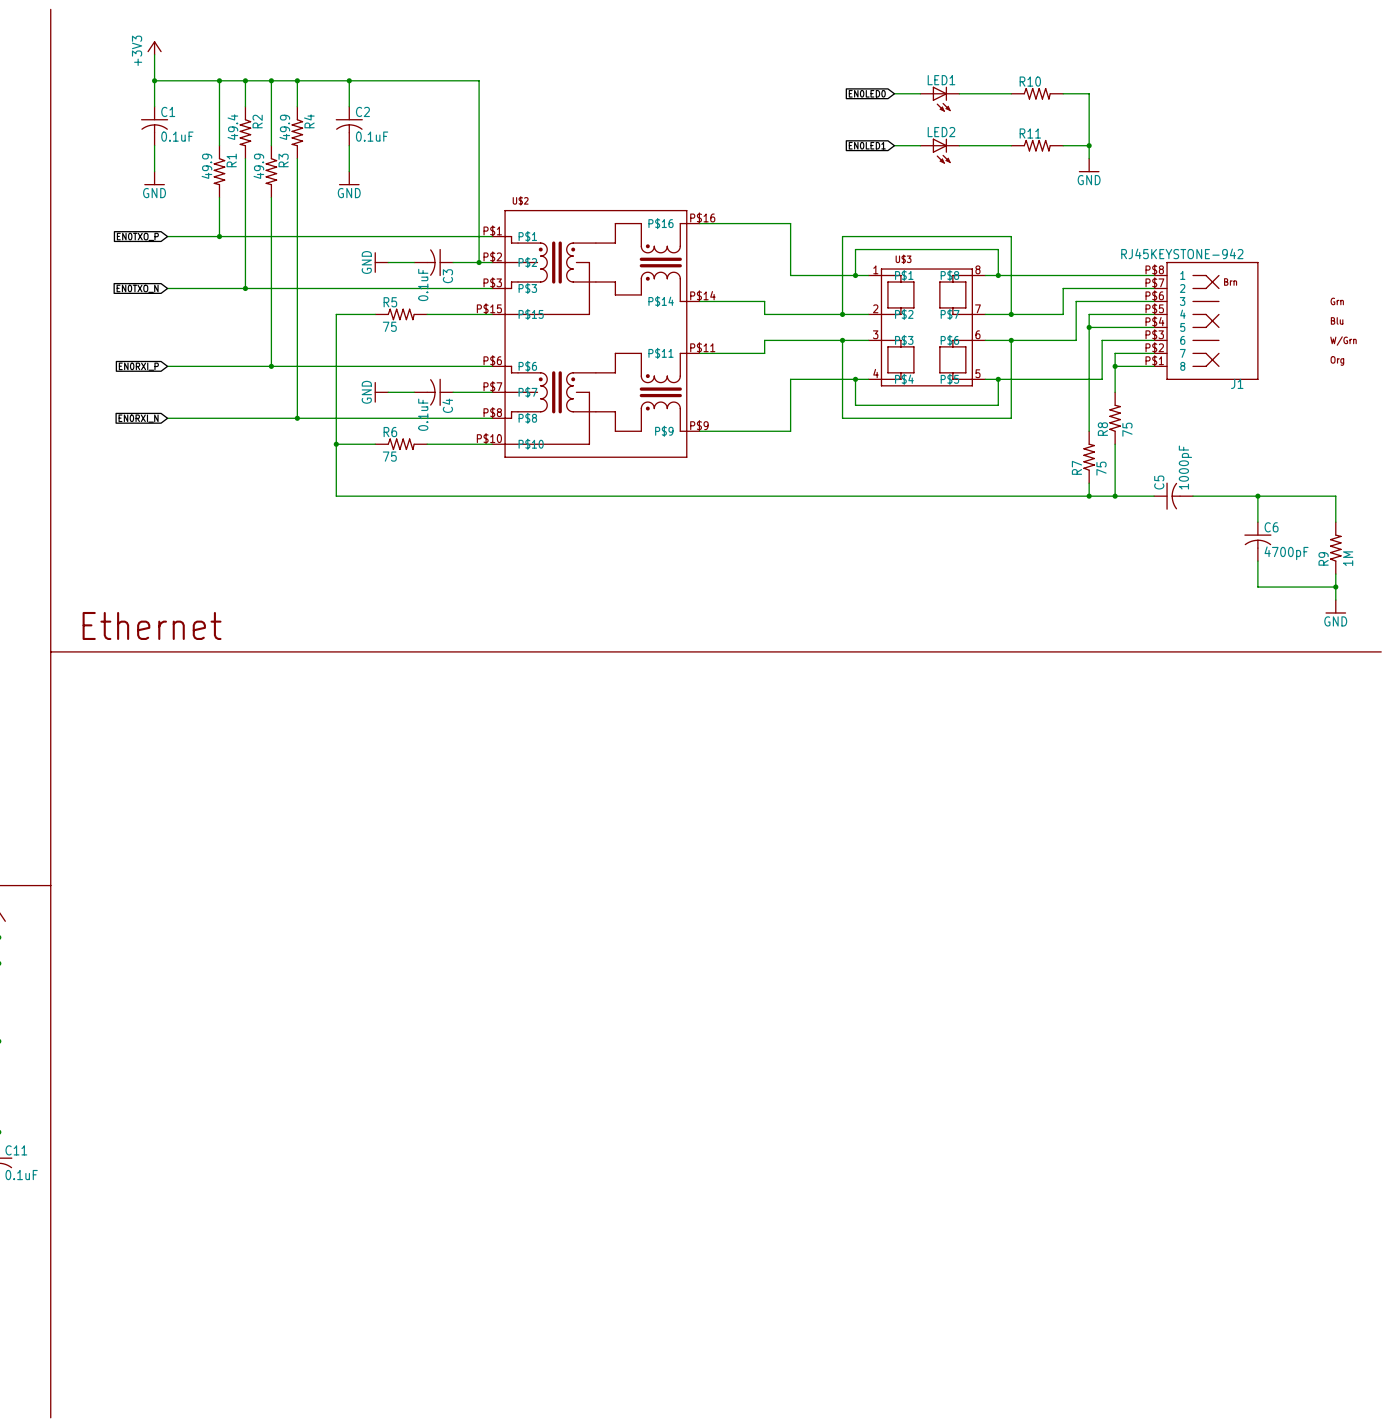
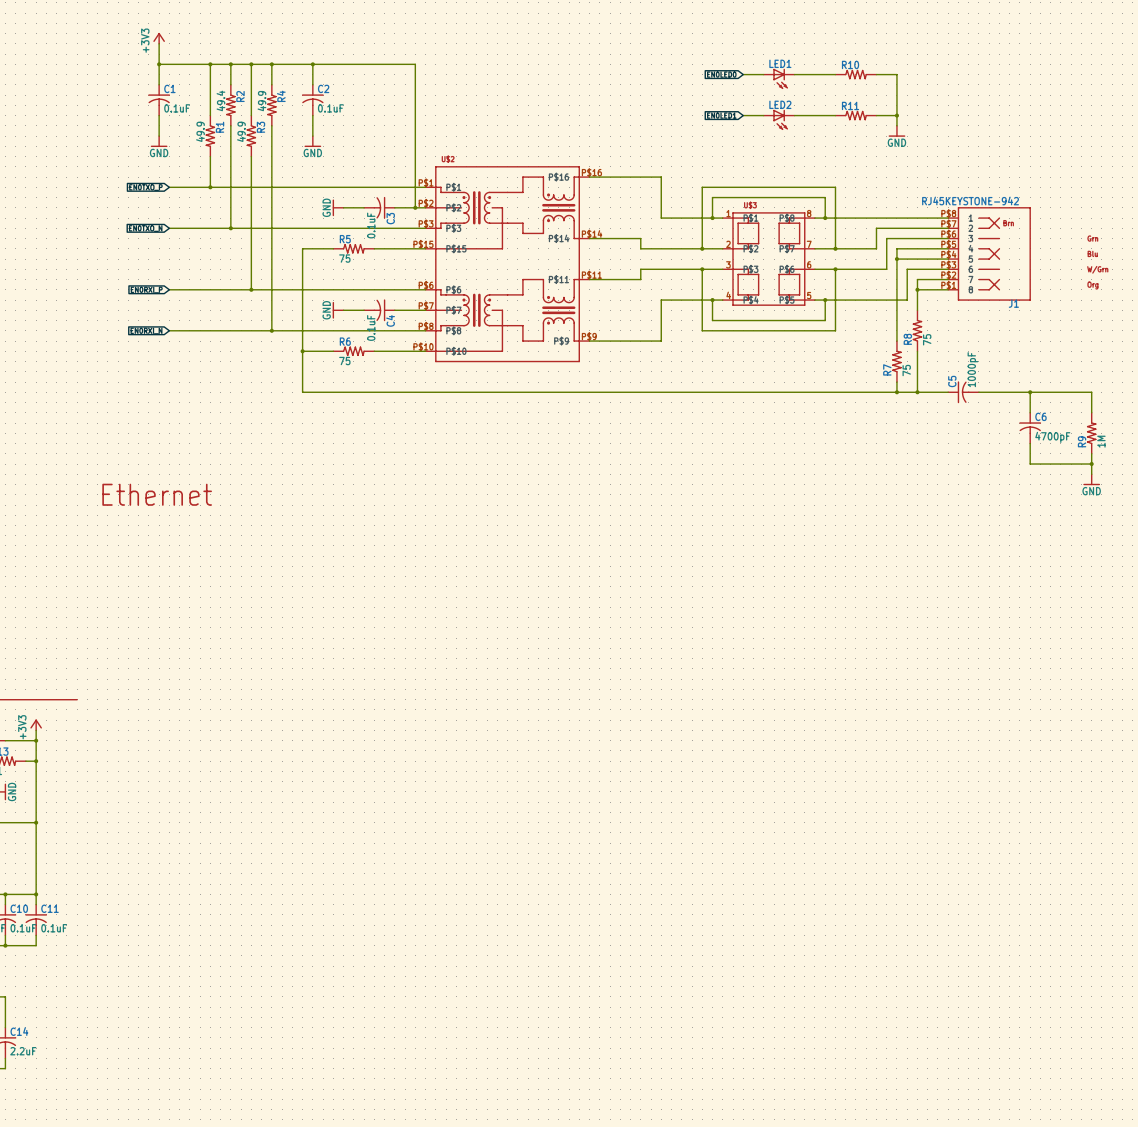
line: (50, 9) (50, 1417) -> none
line: (50, 651) (1381, 651) -> none

